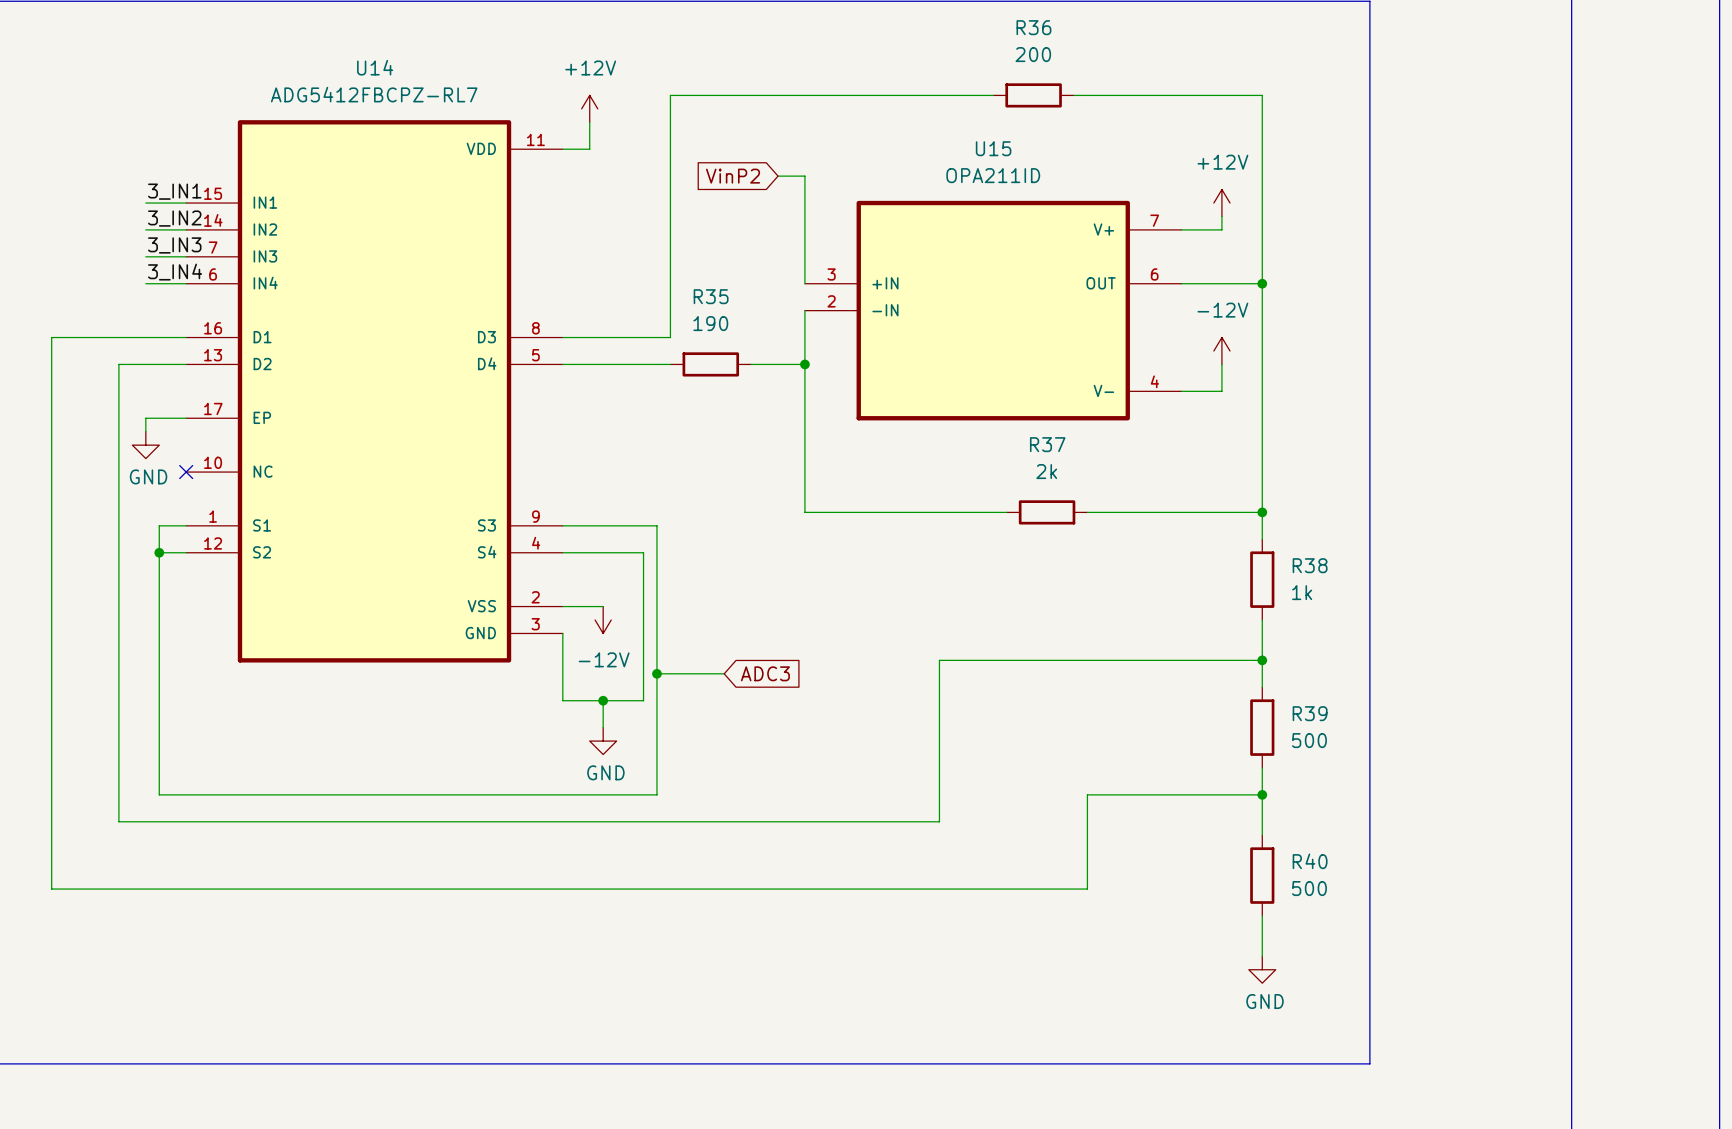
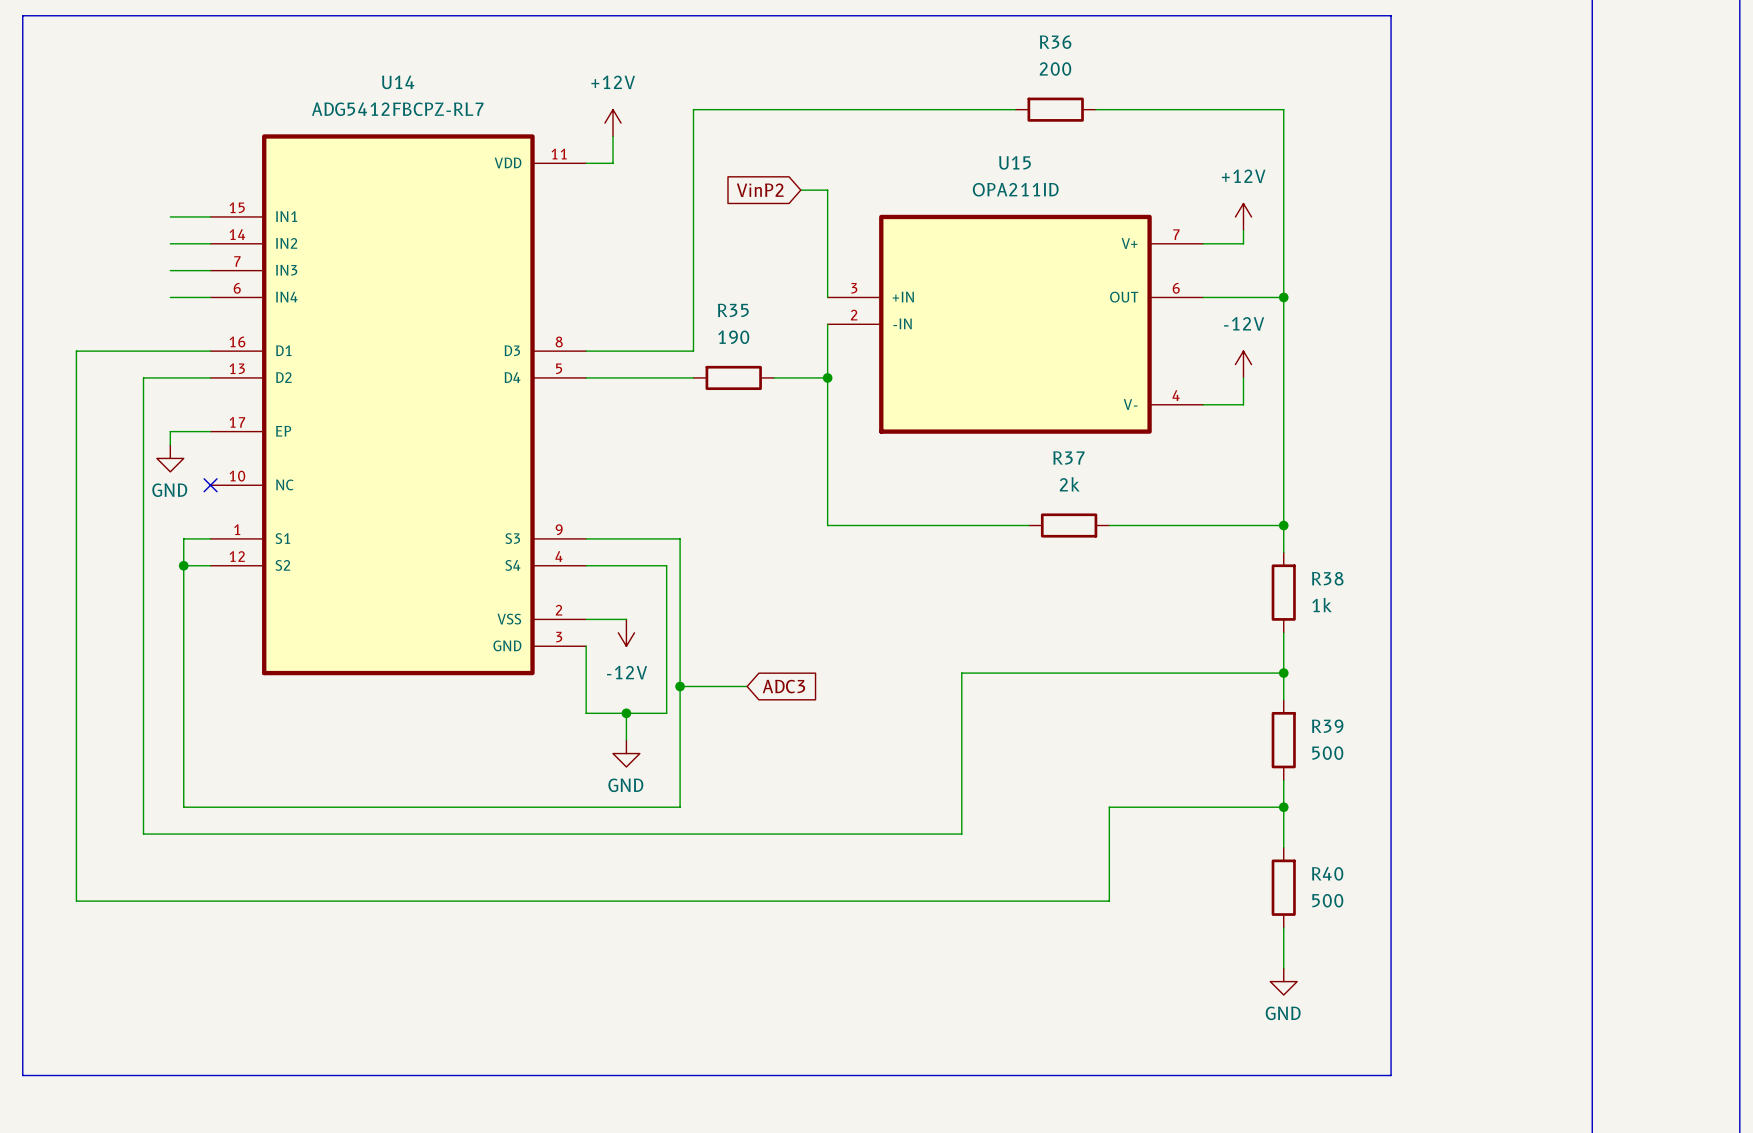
label: 3_IN1 (174, 191) -> none
label: 3_IN2 (174, 218) -> none
label: 3_IN3 (174, 245) -> none
label: 3_IN4 (175, 272) -> none

